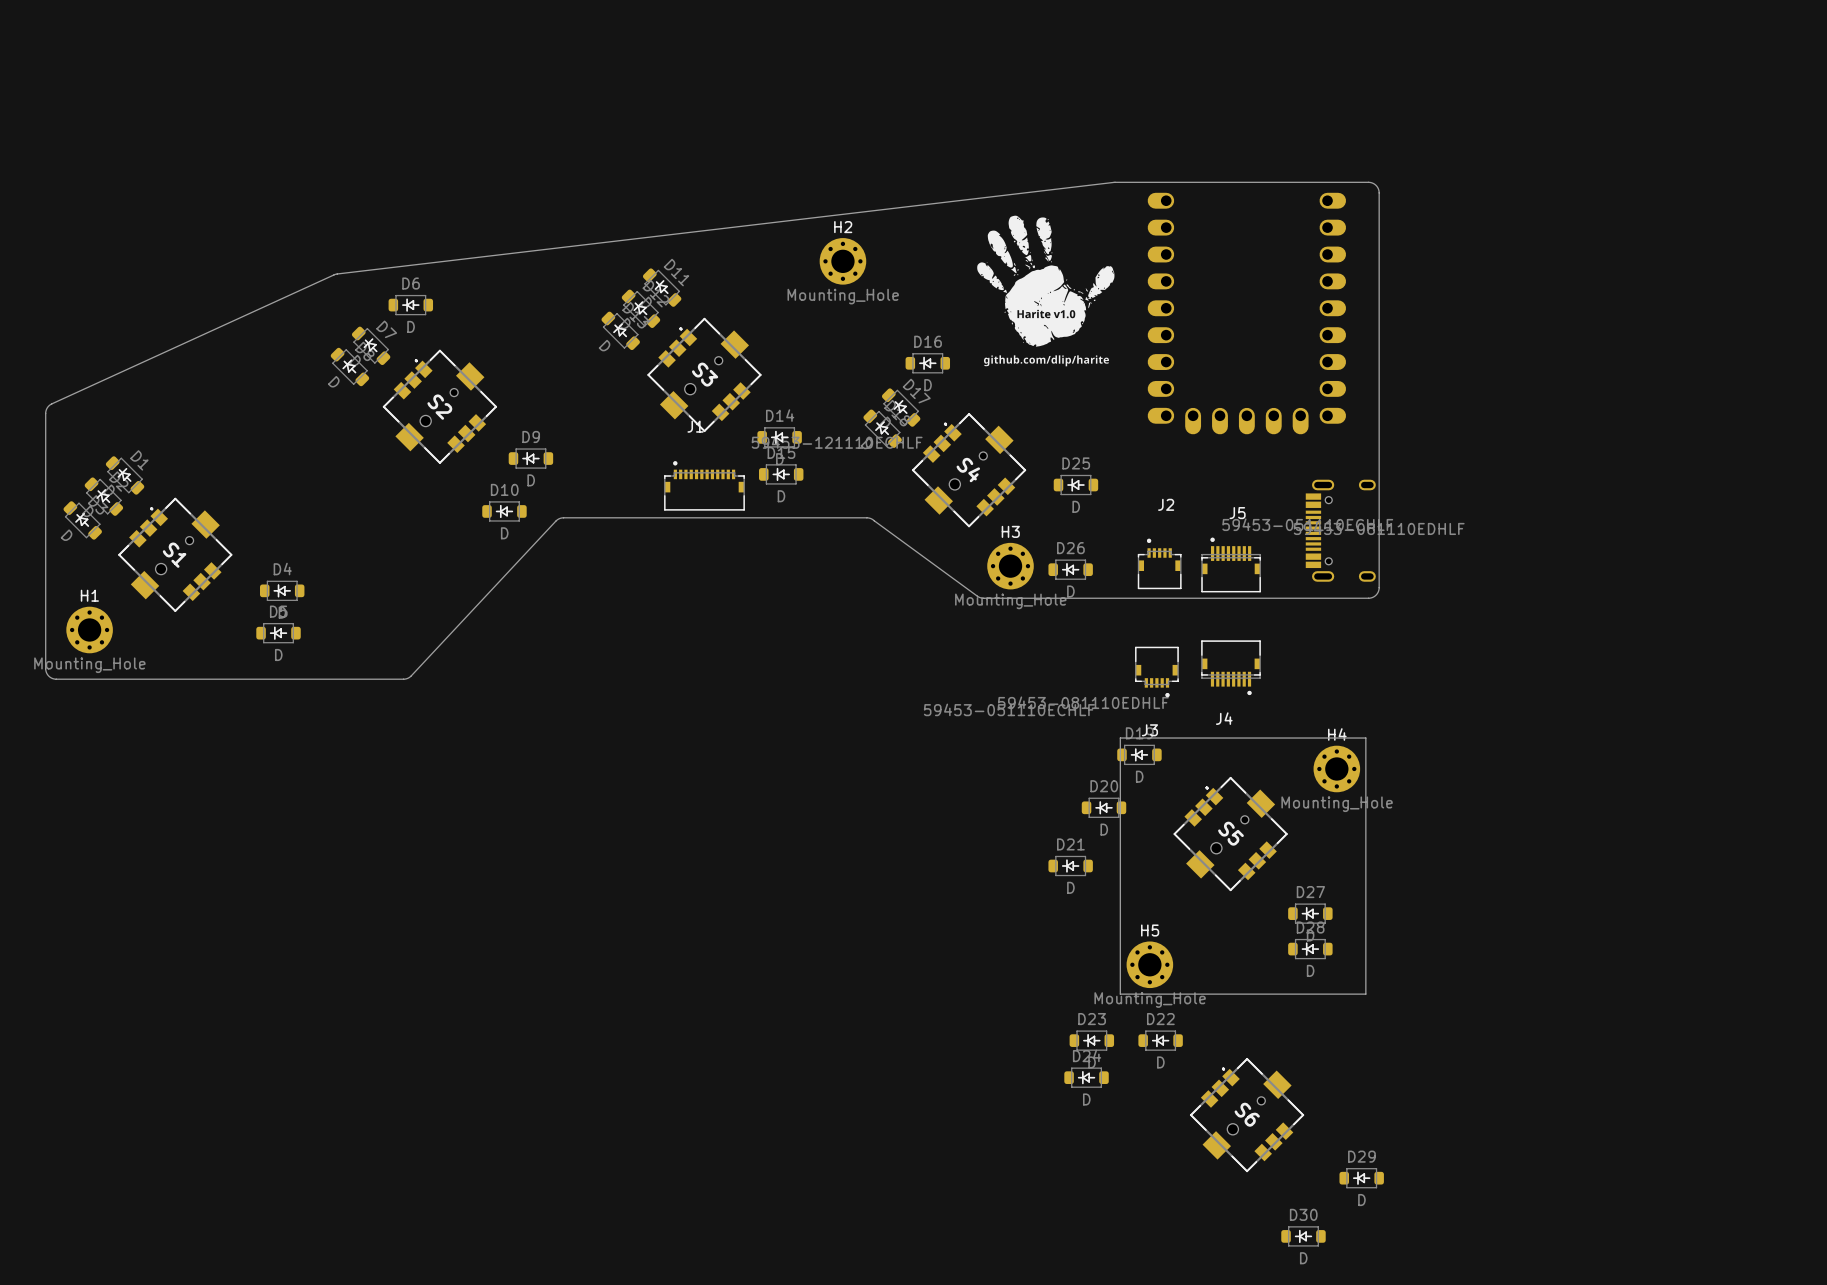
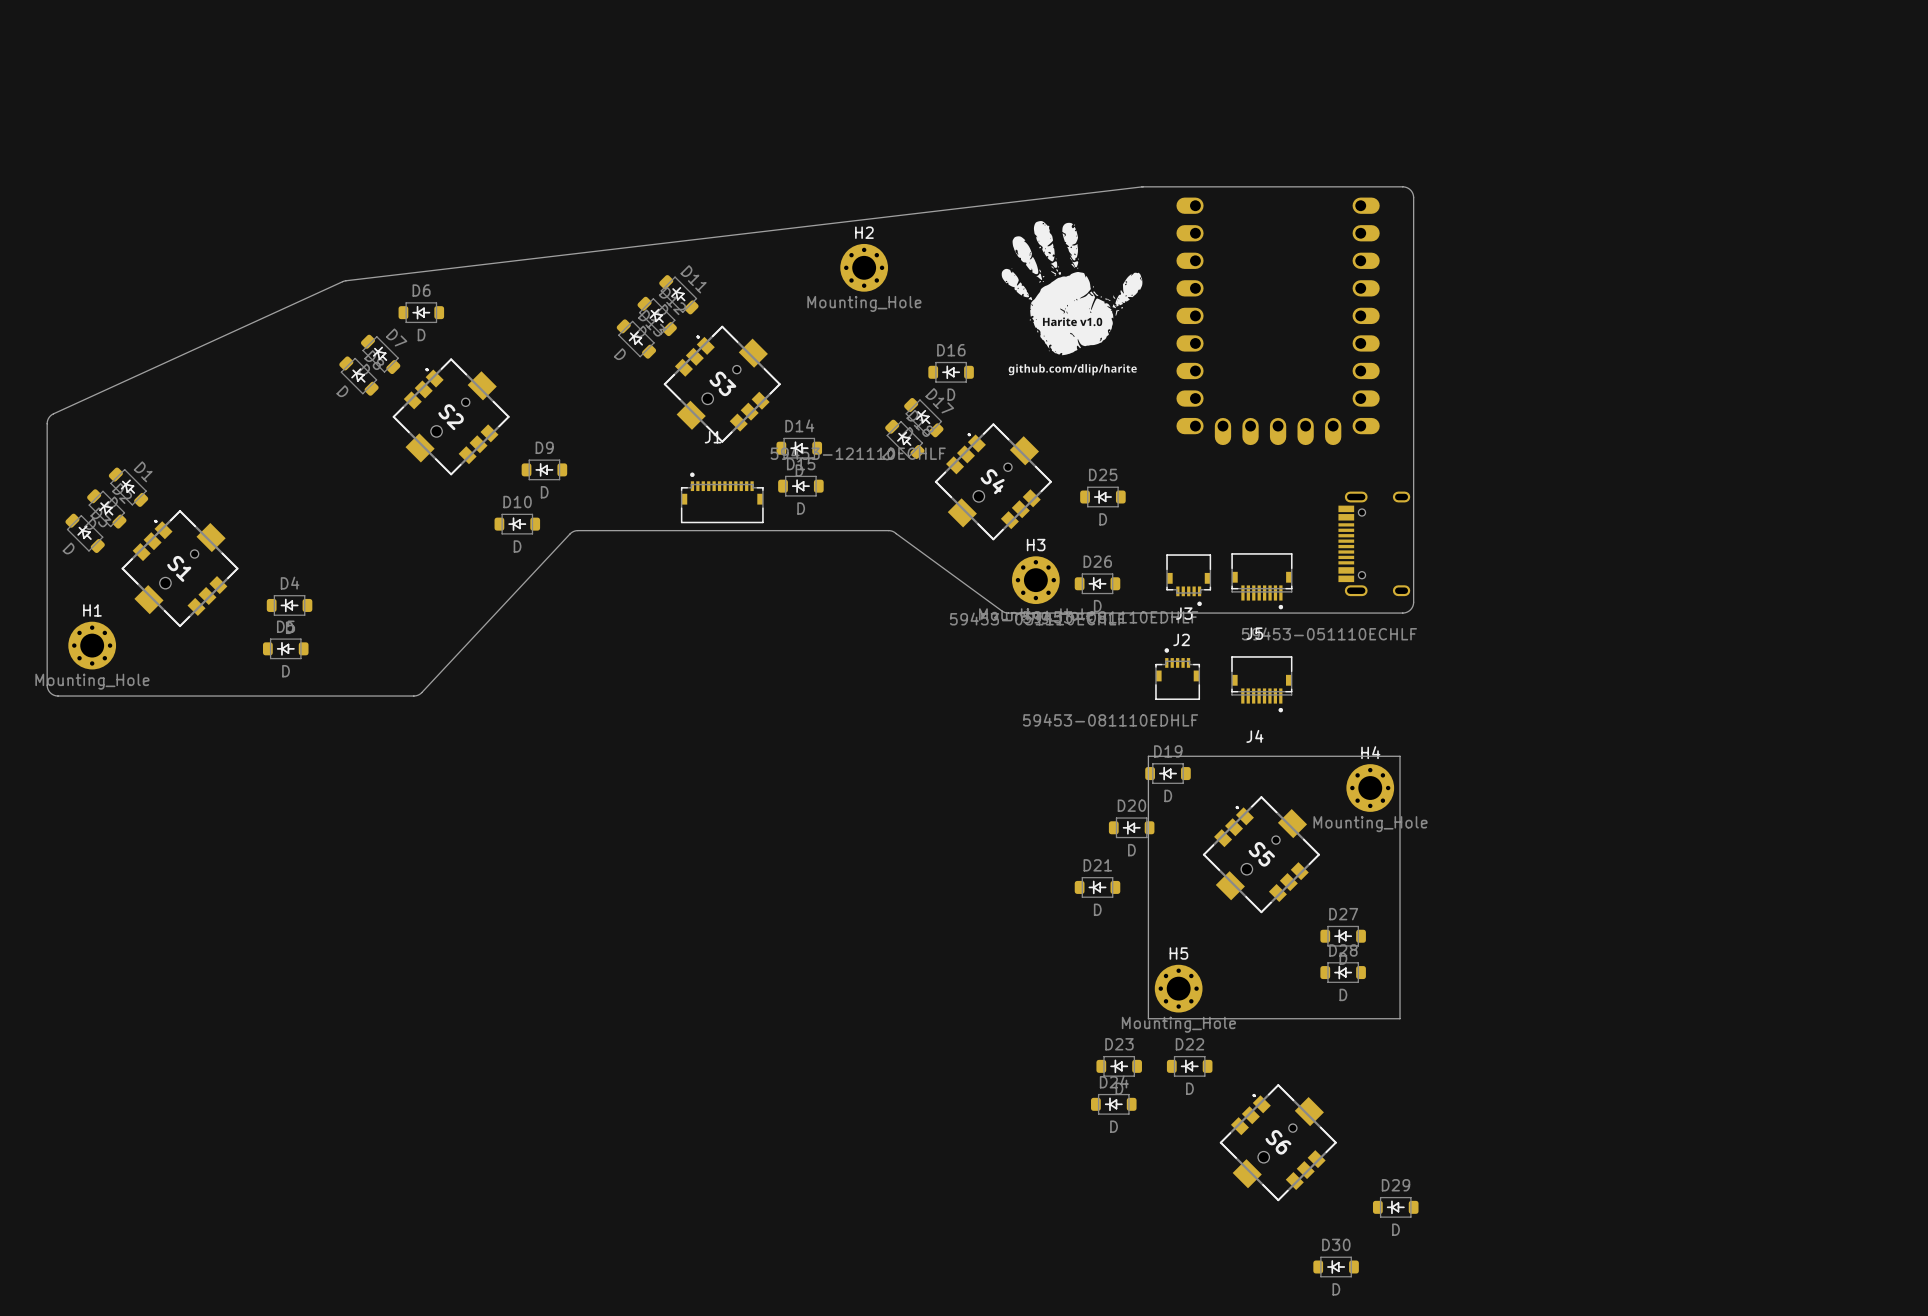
J2 rotation: 0° (1159, 563) -> 180° (1188, 580)
J5 rotation: 0° (1231, 564) -> 180° (1261, 581)
J3 rotation: 0° (1156, 671) -> 180° (1177, 674)

